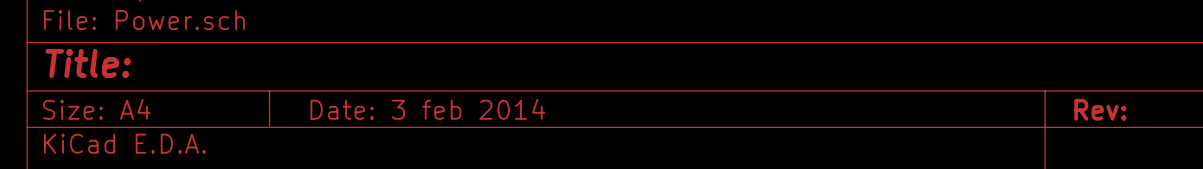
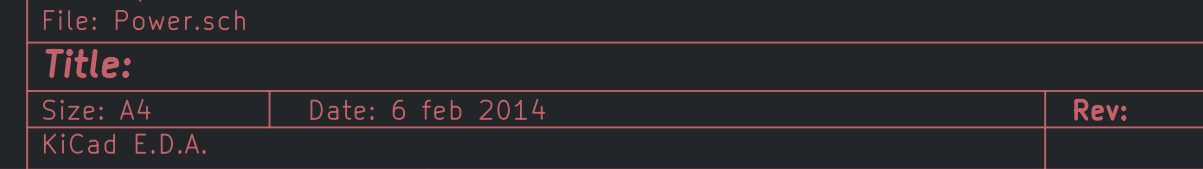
title block: Date: 3 feb 2014 (427, 109) -> Date: 6 feb 2014 (427, 109)

